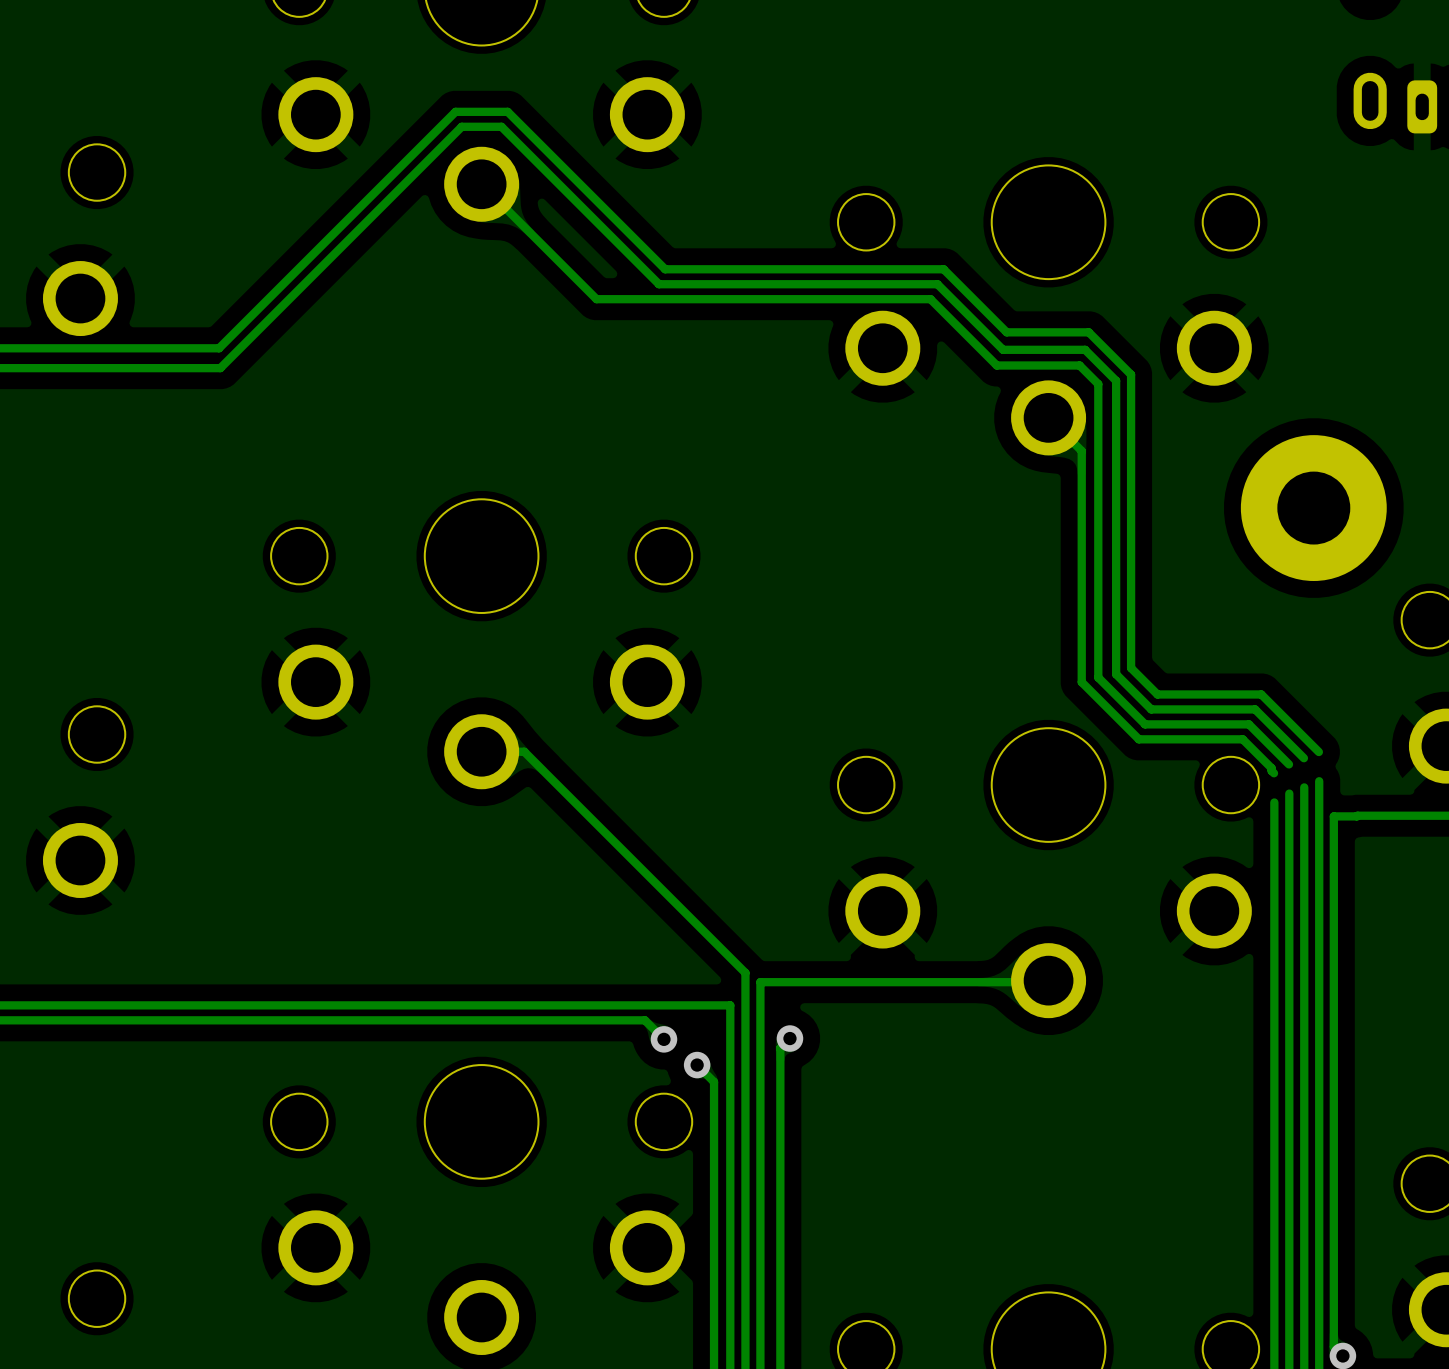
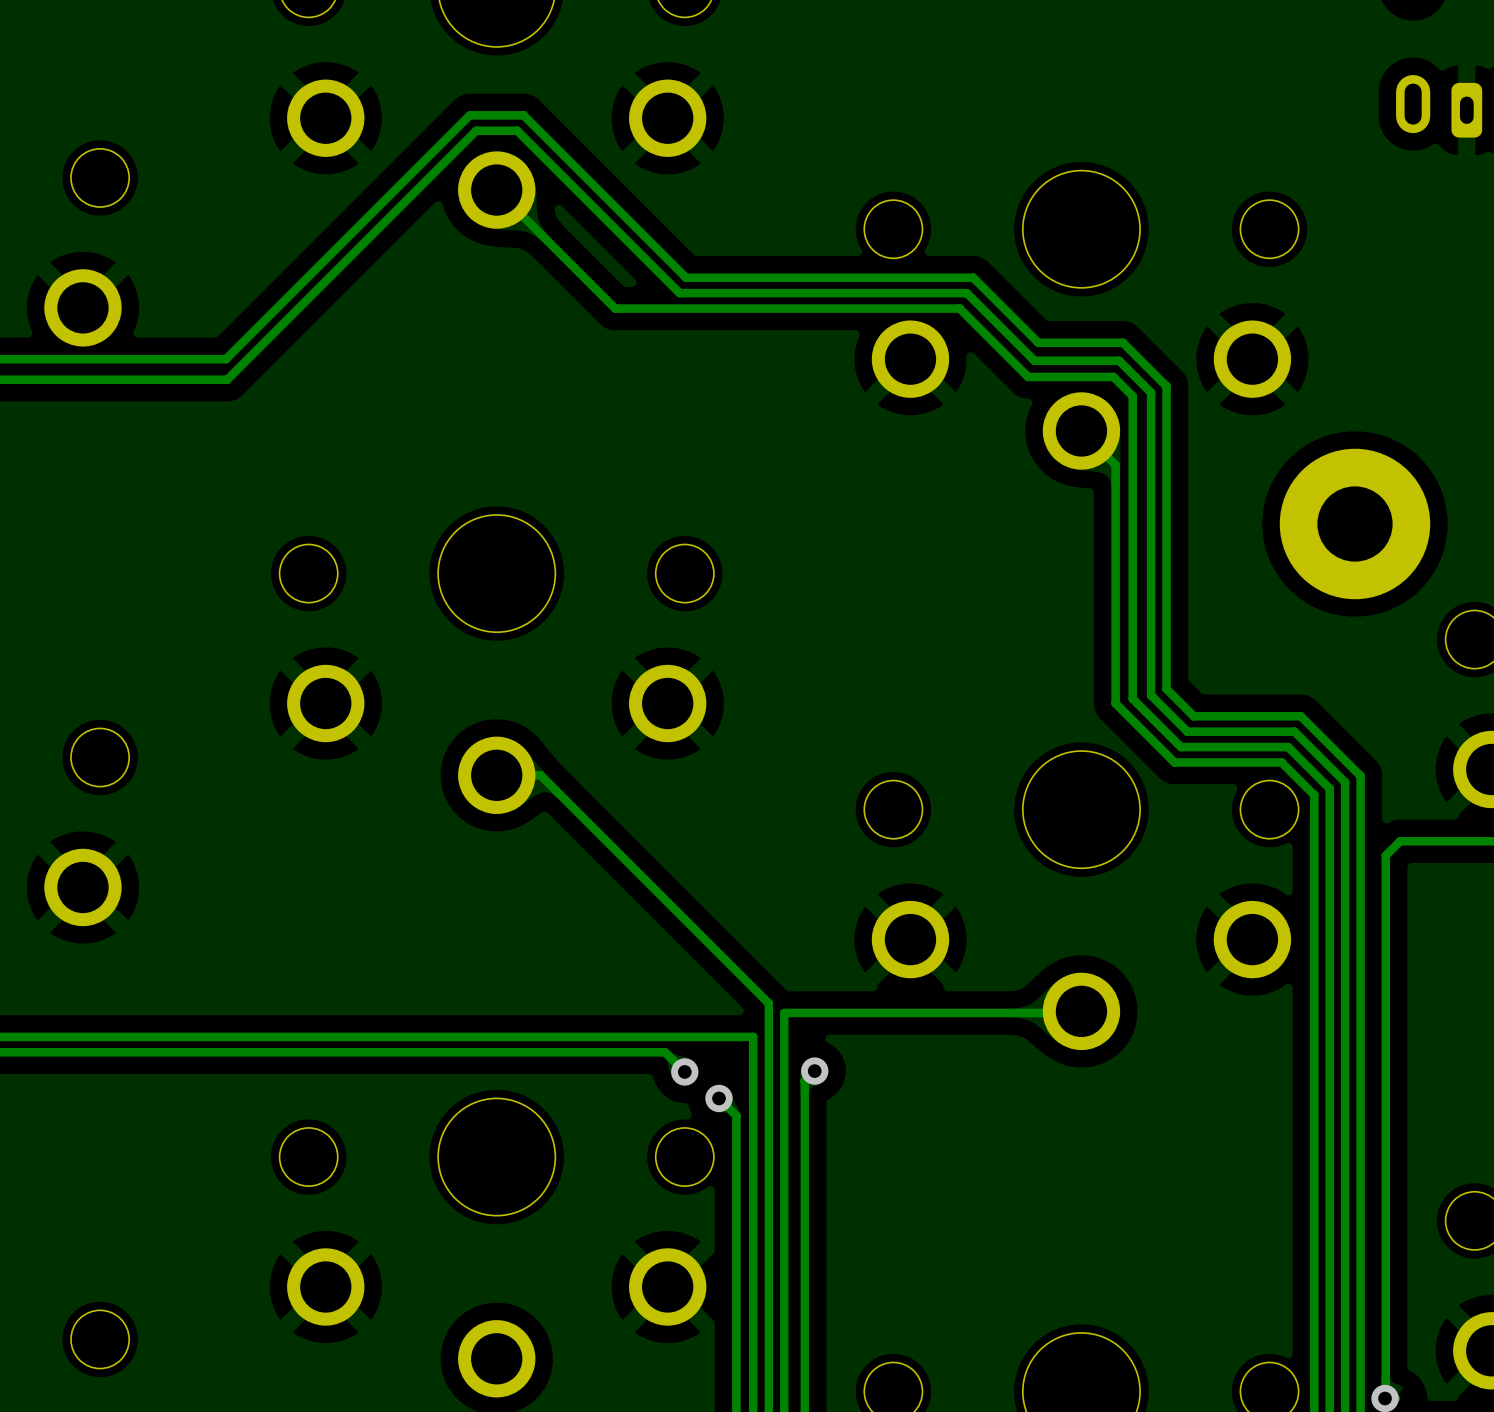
track: none -> (1360, 775) (1360, 805)
track: none -> (1345, 782) (1345, 812)
track: none -> (1329, 788) (1329, 818)
track: (1271, 768) (1274, 773) -> (1311, 792) (1314, 795) (1314, 827)
track: (1356, 816) (1333, 816) (1333, 1346) (1342, 1355) -> (1399, 841) (1385, 855) (1385, 1397) (1396, 1398)

